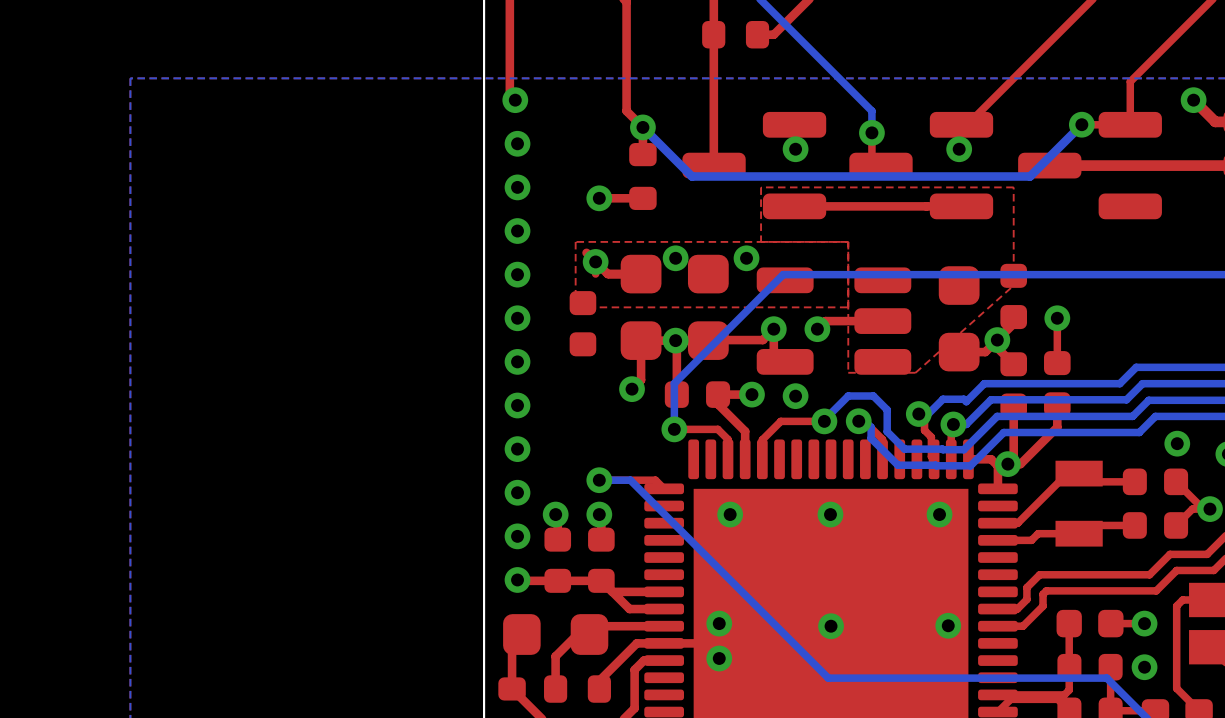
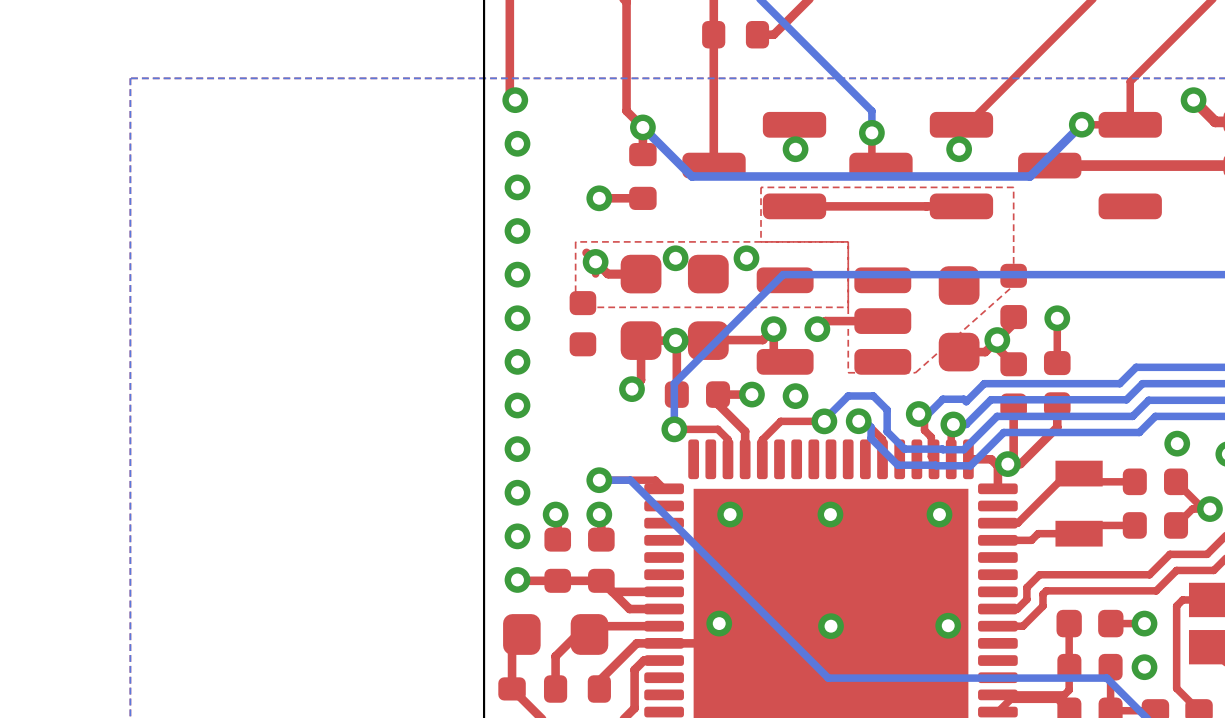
via: (719, 658) -> none

